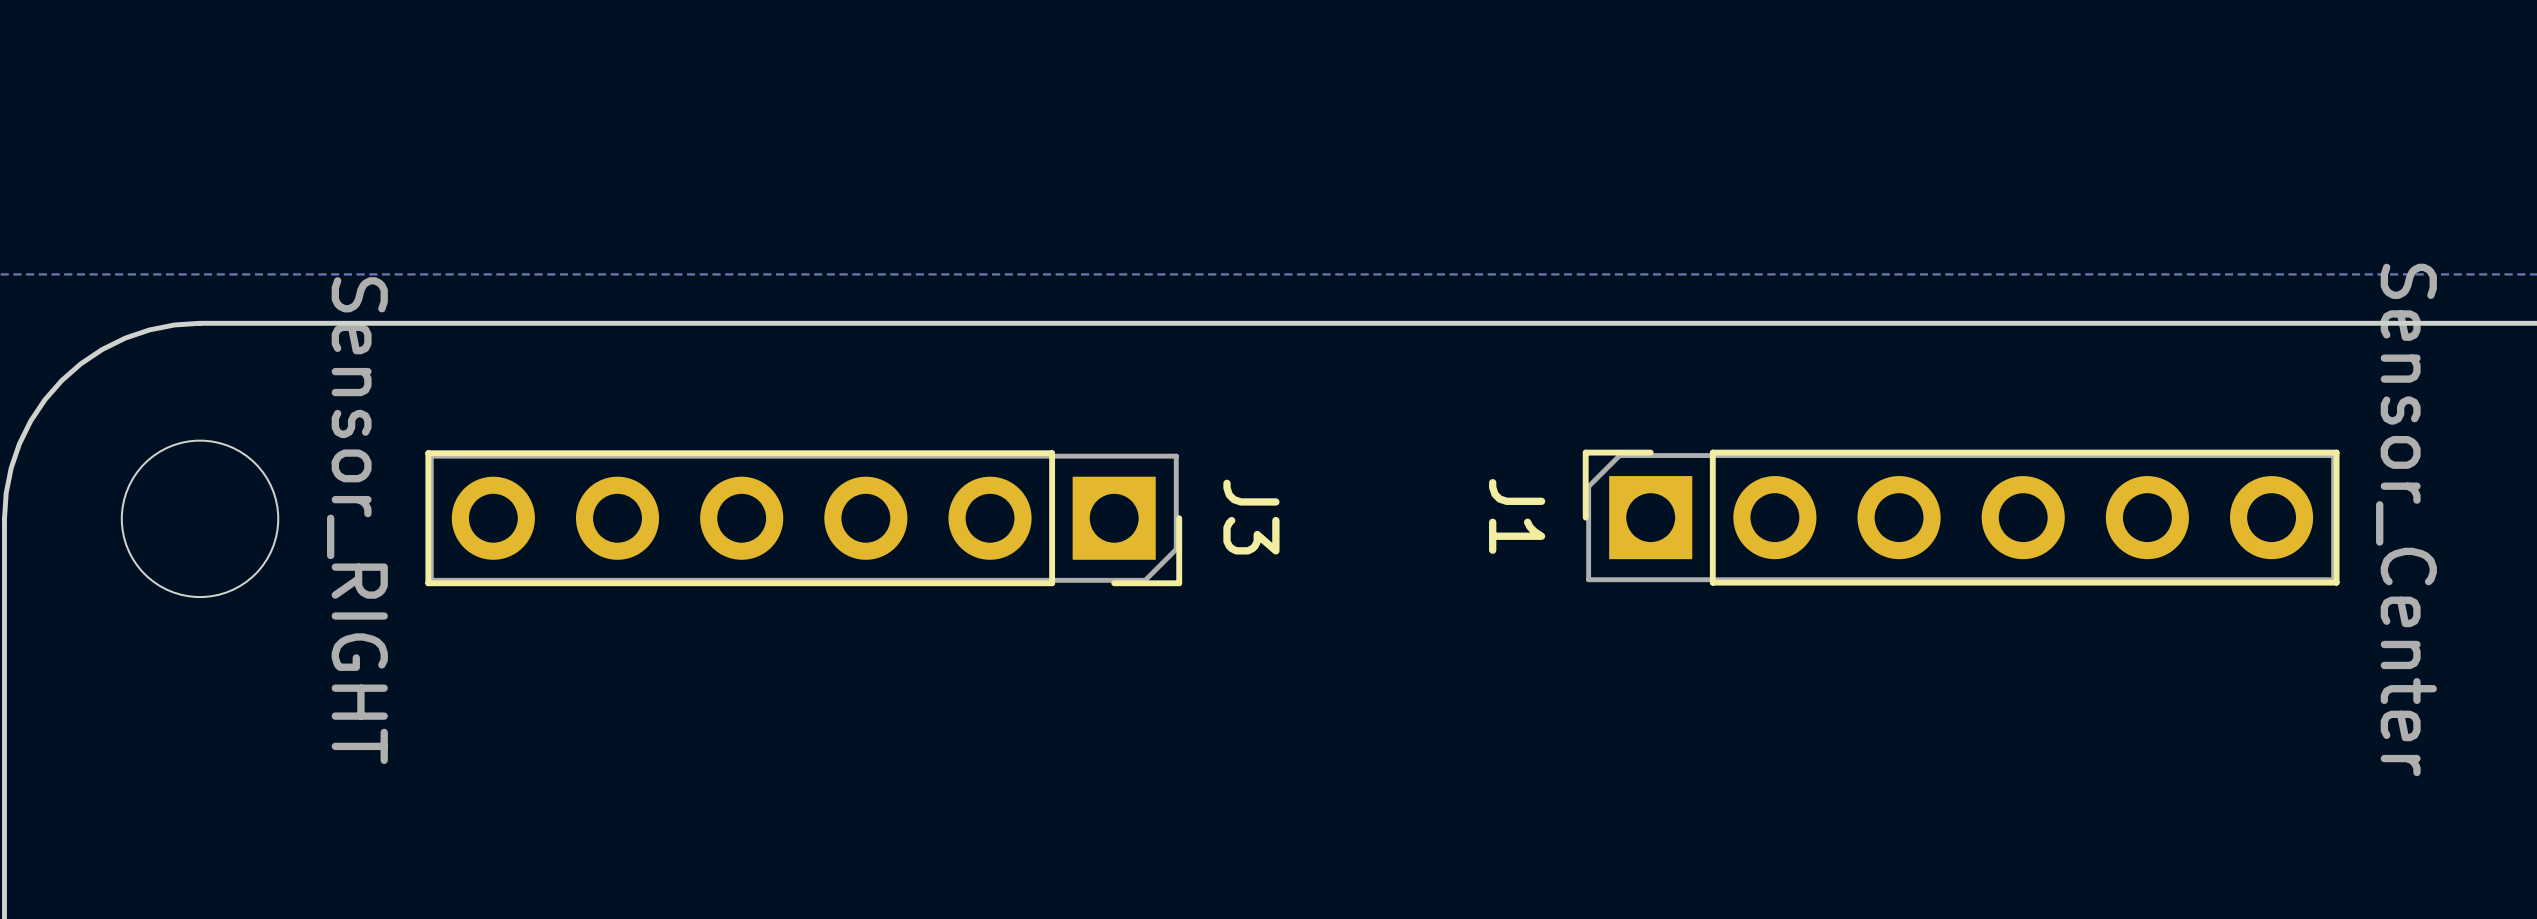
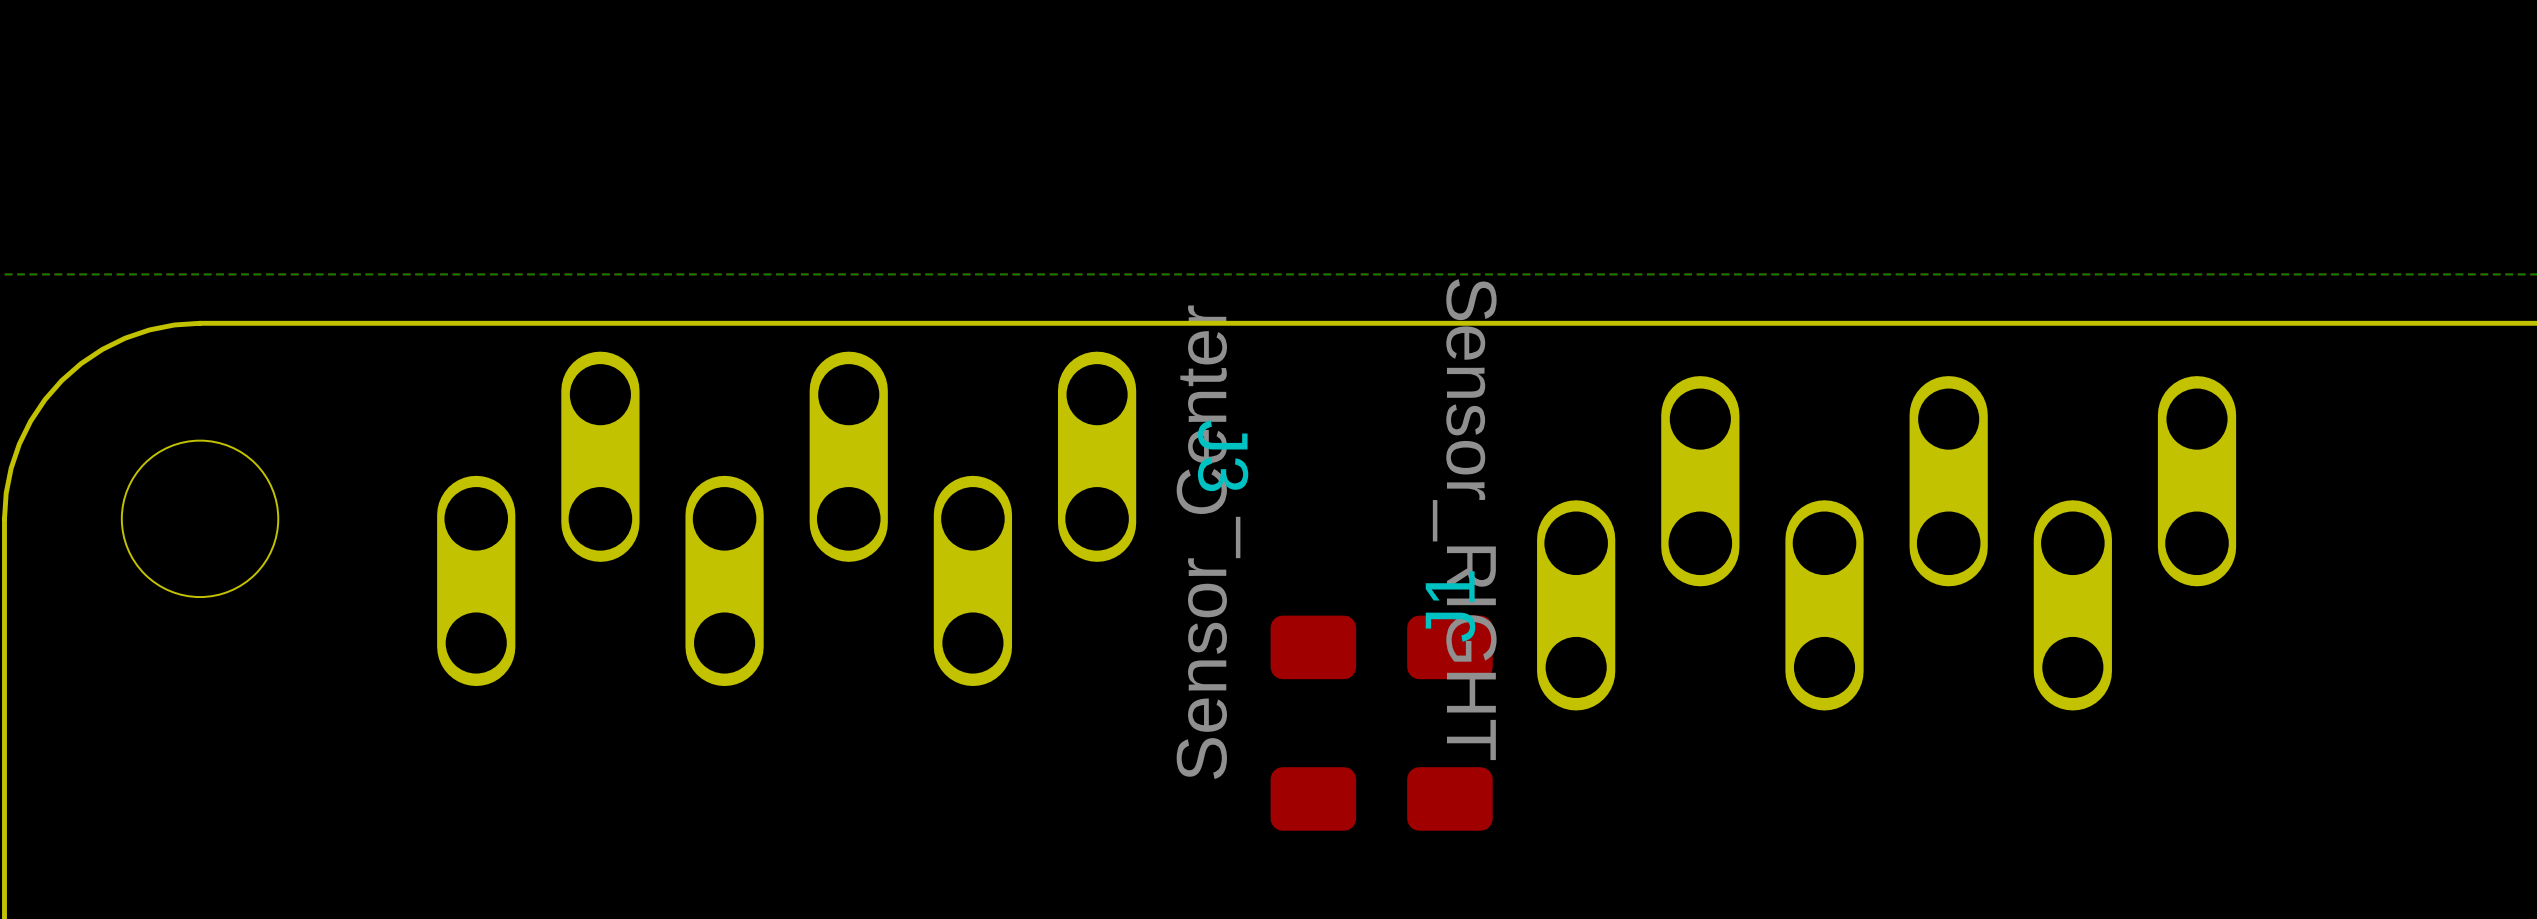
J1 footprint: [1582, 449, 2340, 586] -> [1537, 376, 2237, 711]
J3 footprint: [425, 450, 1183, 587] -> [437, 351, 1137, 687]
J1 value position: Sensor_Center (2406, 519) -> Sensor_Center (1208, 542)
J3 value position: Sensor_RIGHT (357, 520) -> Sensor_RIGHT (1464, 519)
part: none -> (1313, 723)
part: none -> (1449, 723)

